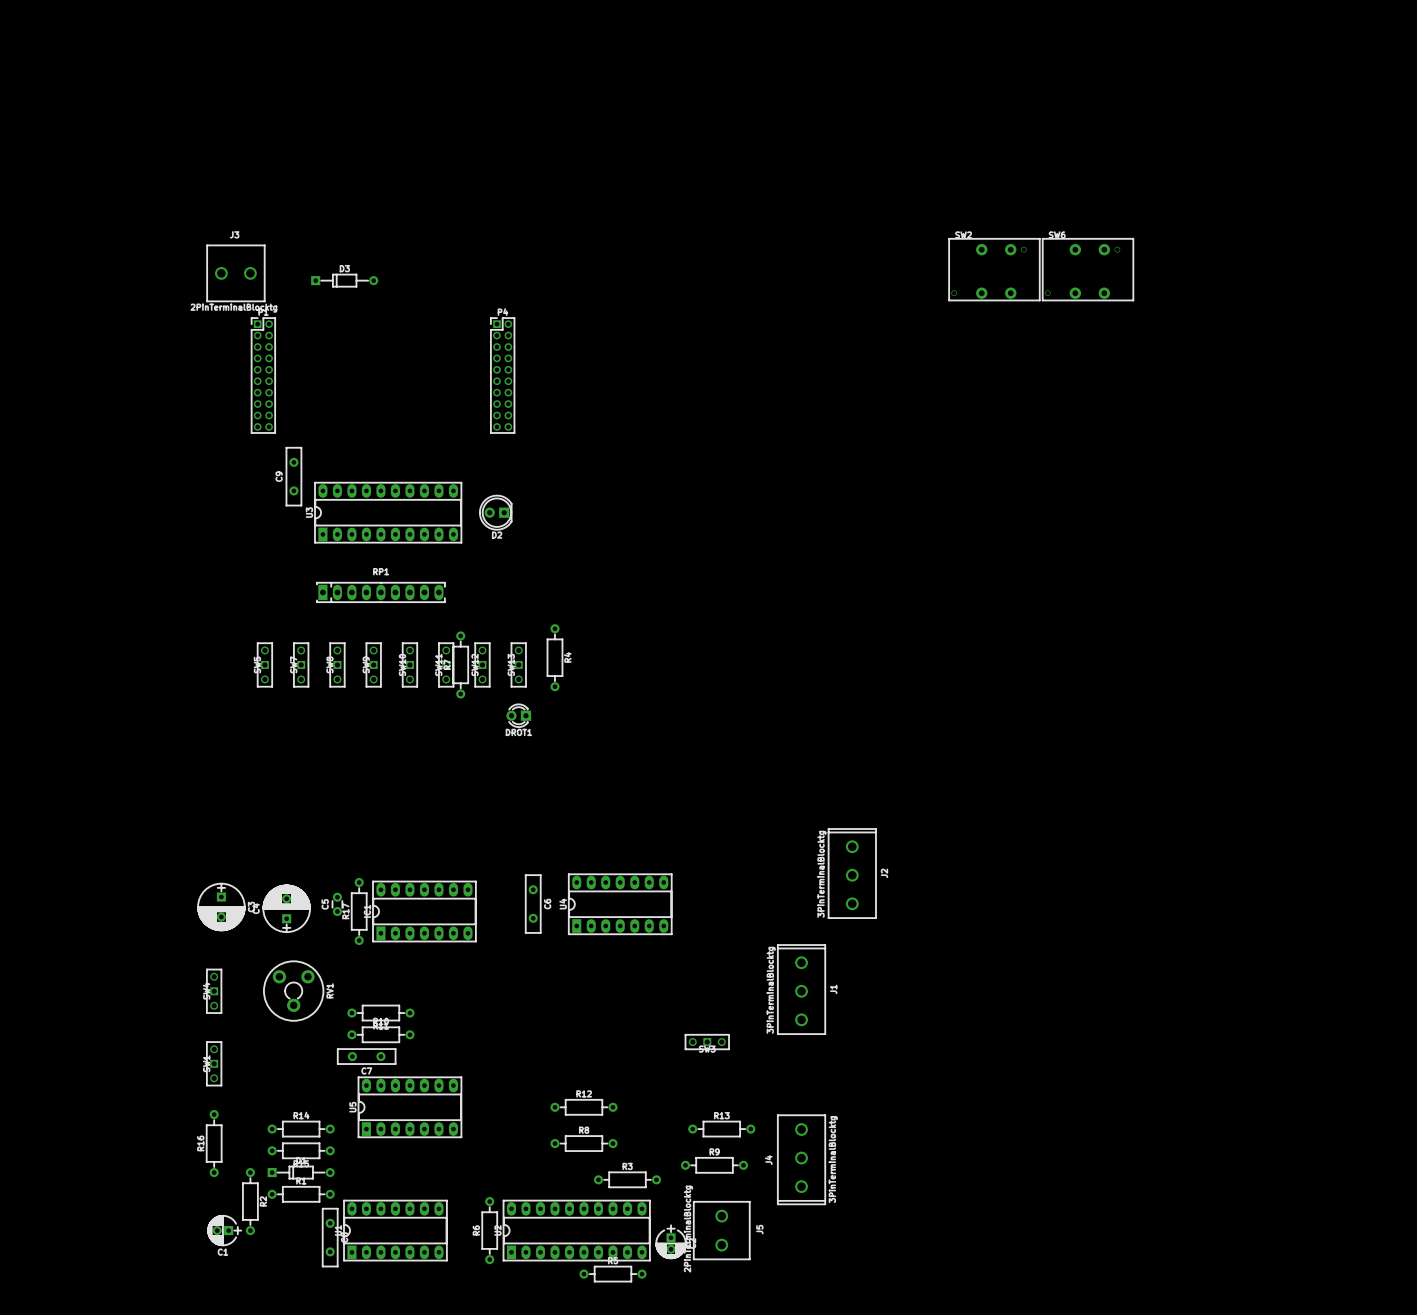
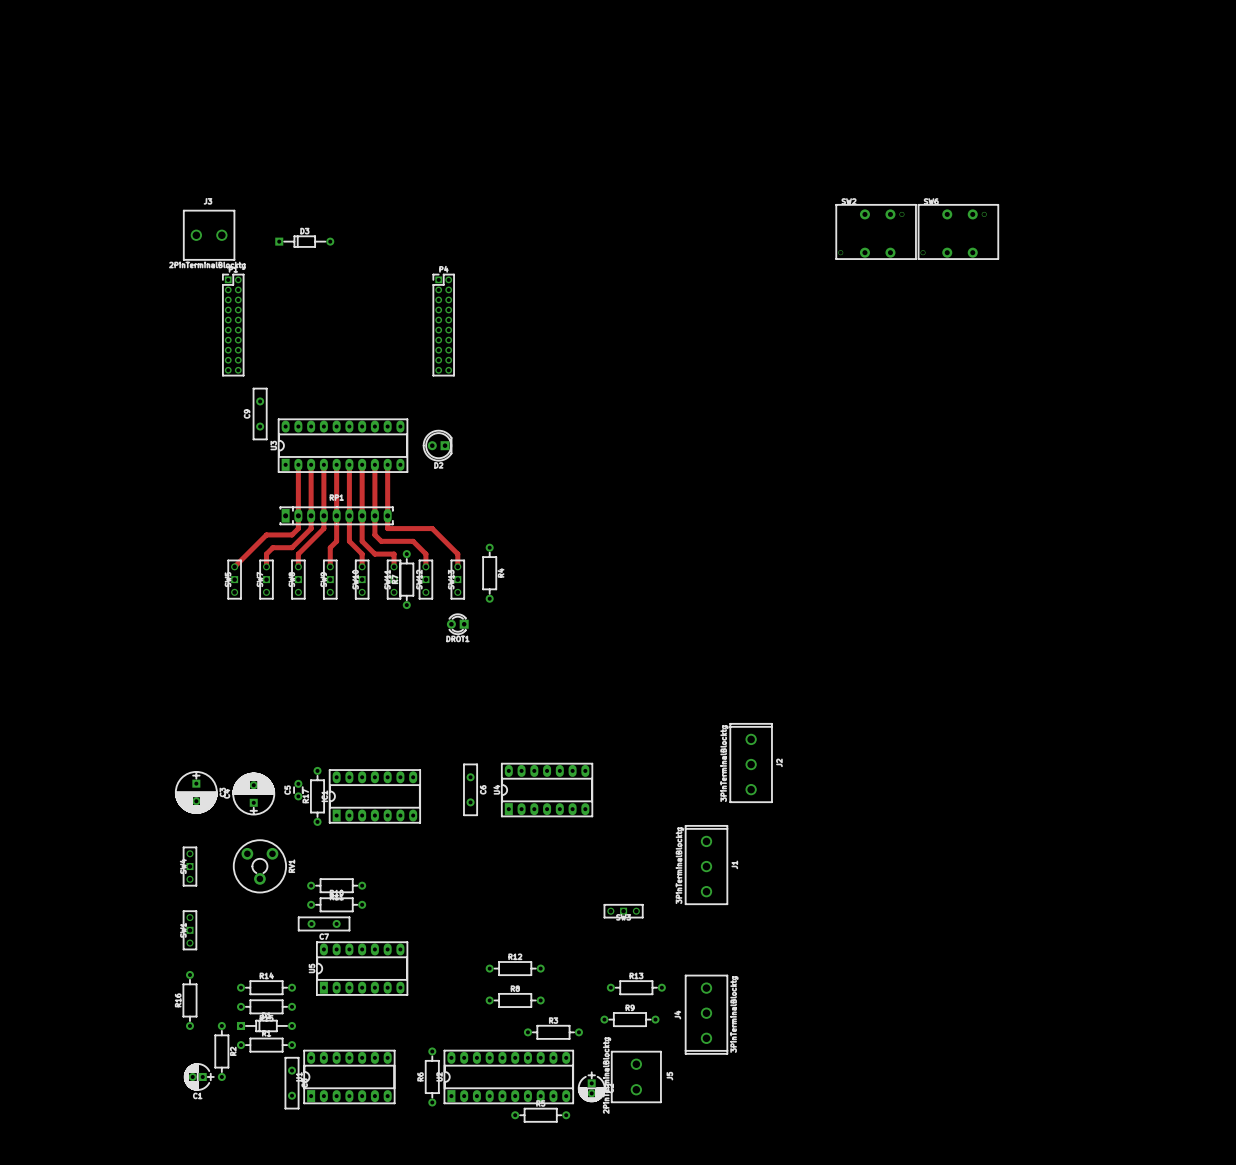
top track: none -> (298, 464) (298, 528) (292, 534) (266, 534) (234, 566)
top track: none -> (311, 464) (311, 528) (292, 547) (272, 547) (266, 554) (266, 566)
top track: none -> (323, 464) (323, 528) (298, 554) (298, 566)
top track: none -> (336, 464) (336, 541) (330, 547) (330, 566)
top track: none -> (349, 464) (349, 541) (362, 554) (362, 566)
top track: none -> (362, 464) (362, 541) (374, 554) (394, 554) (394, 566)
top track: none -> (374, 464) (374, 534) (381, 541) (413, 541) (425, 554) (425, 566)
top track: none -> (387, 464) (387, 528) (432, 528) (457, 554) (457, 566)

